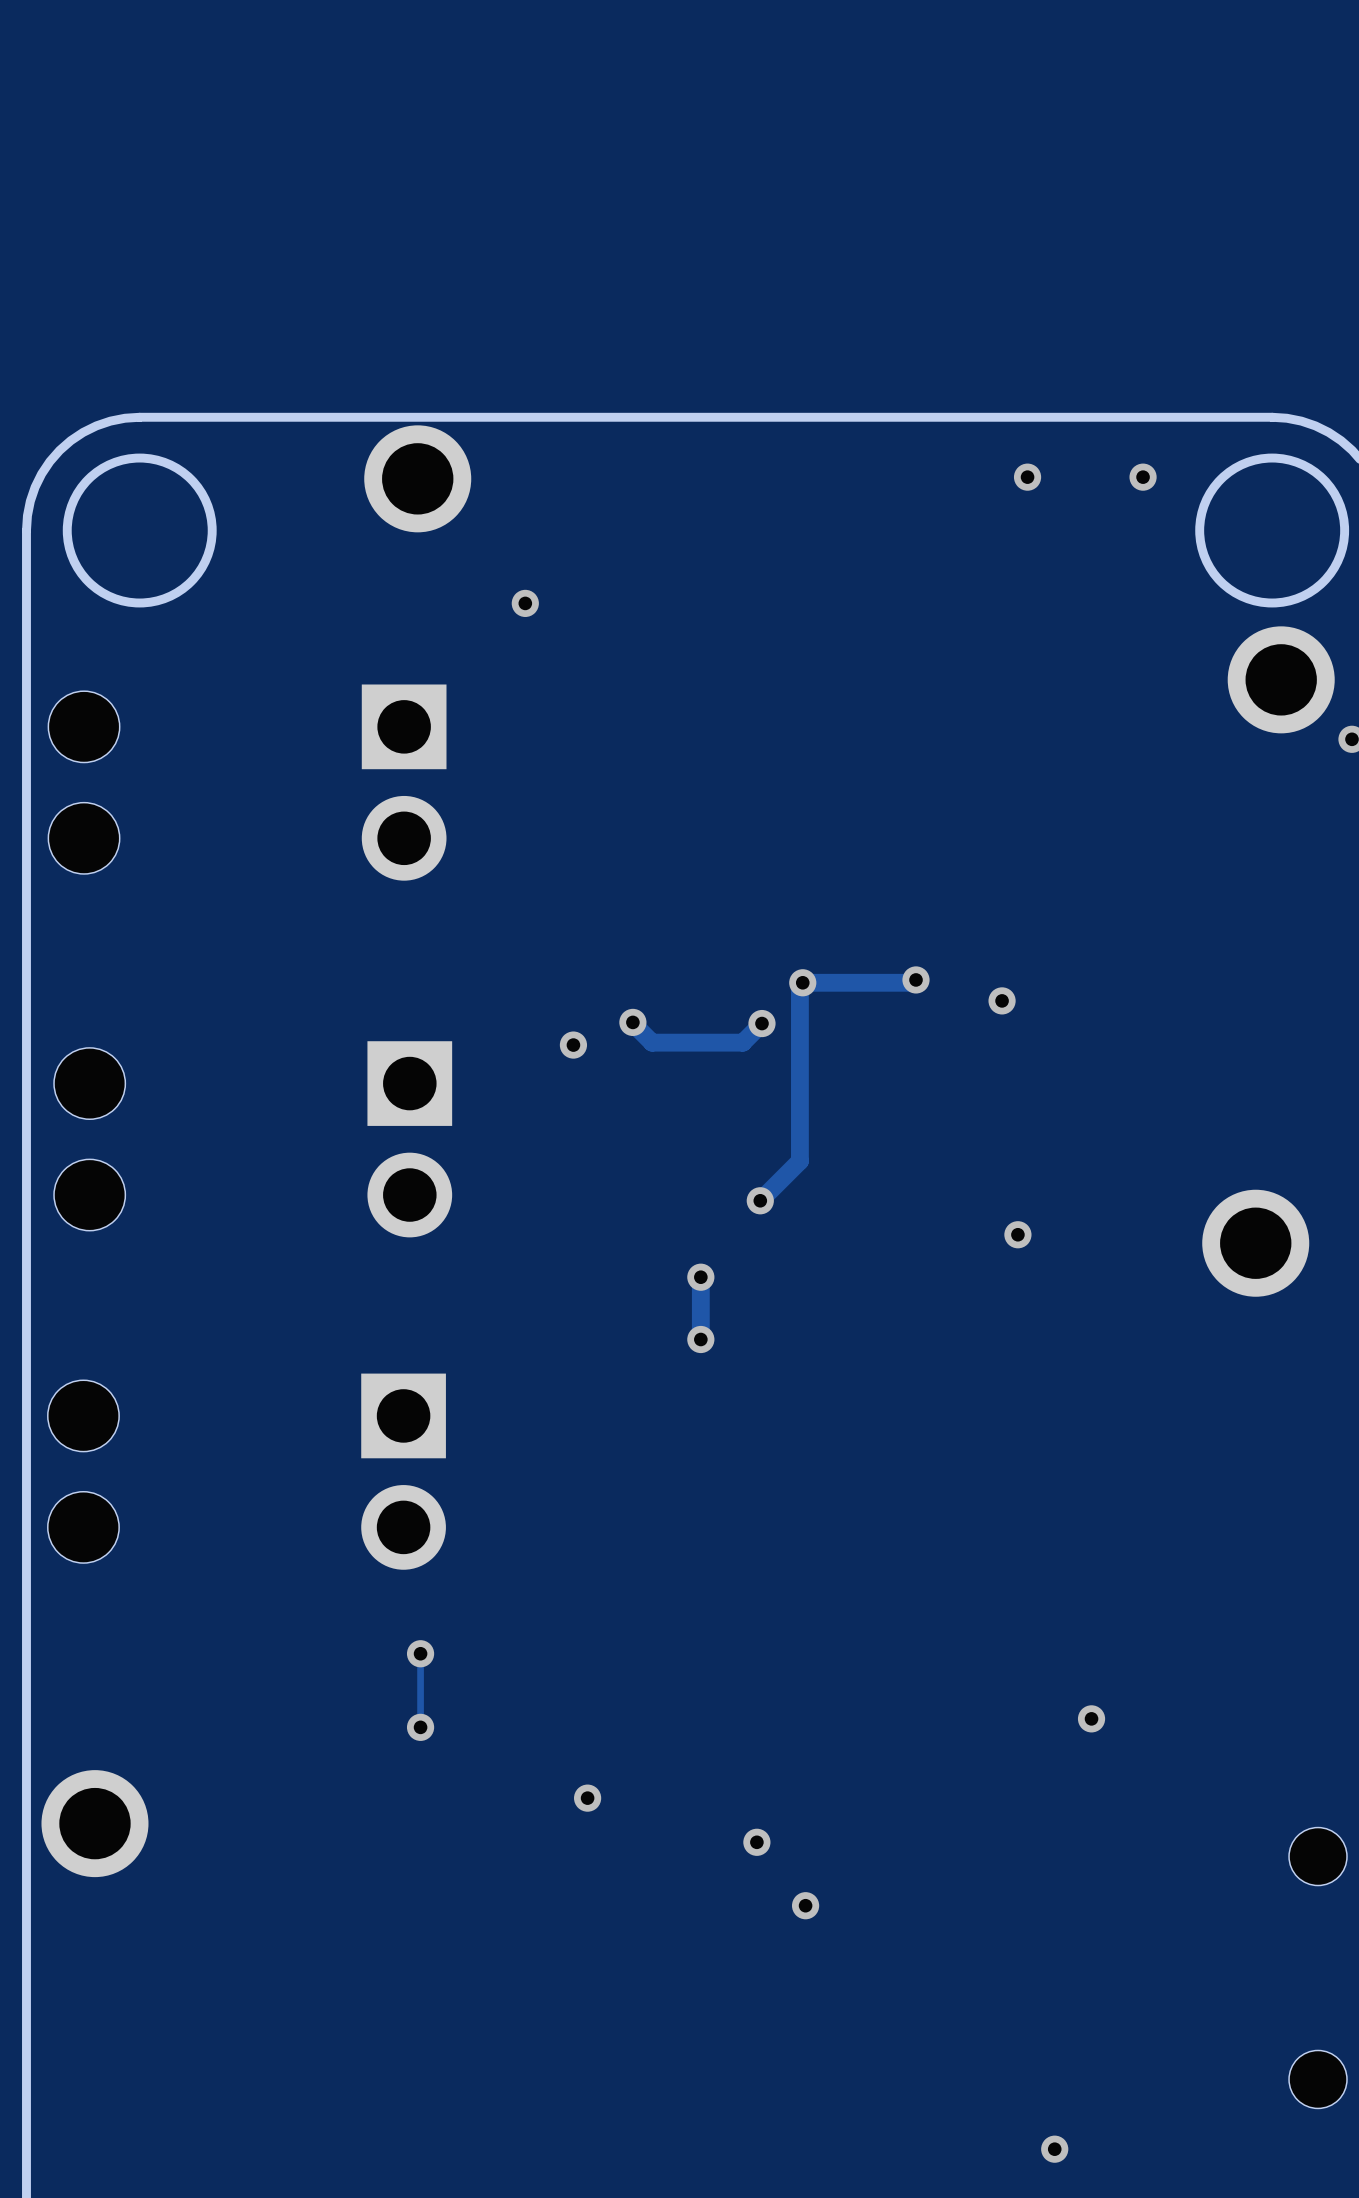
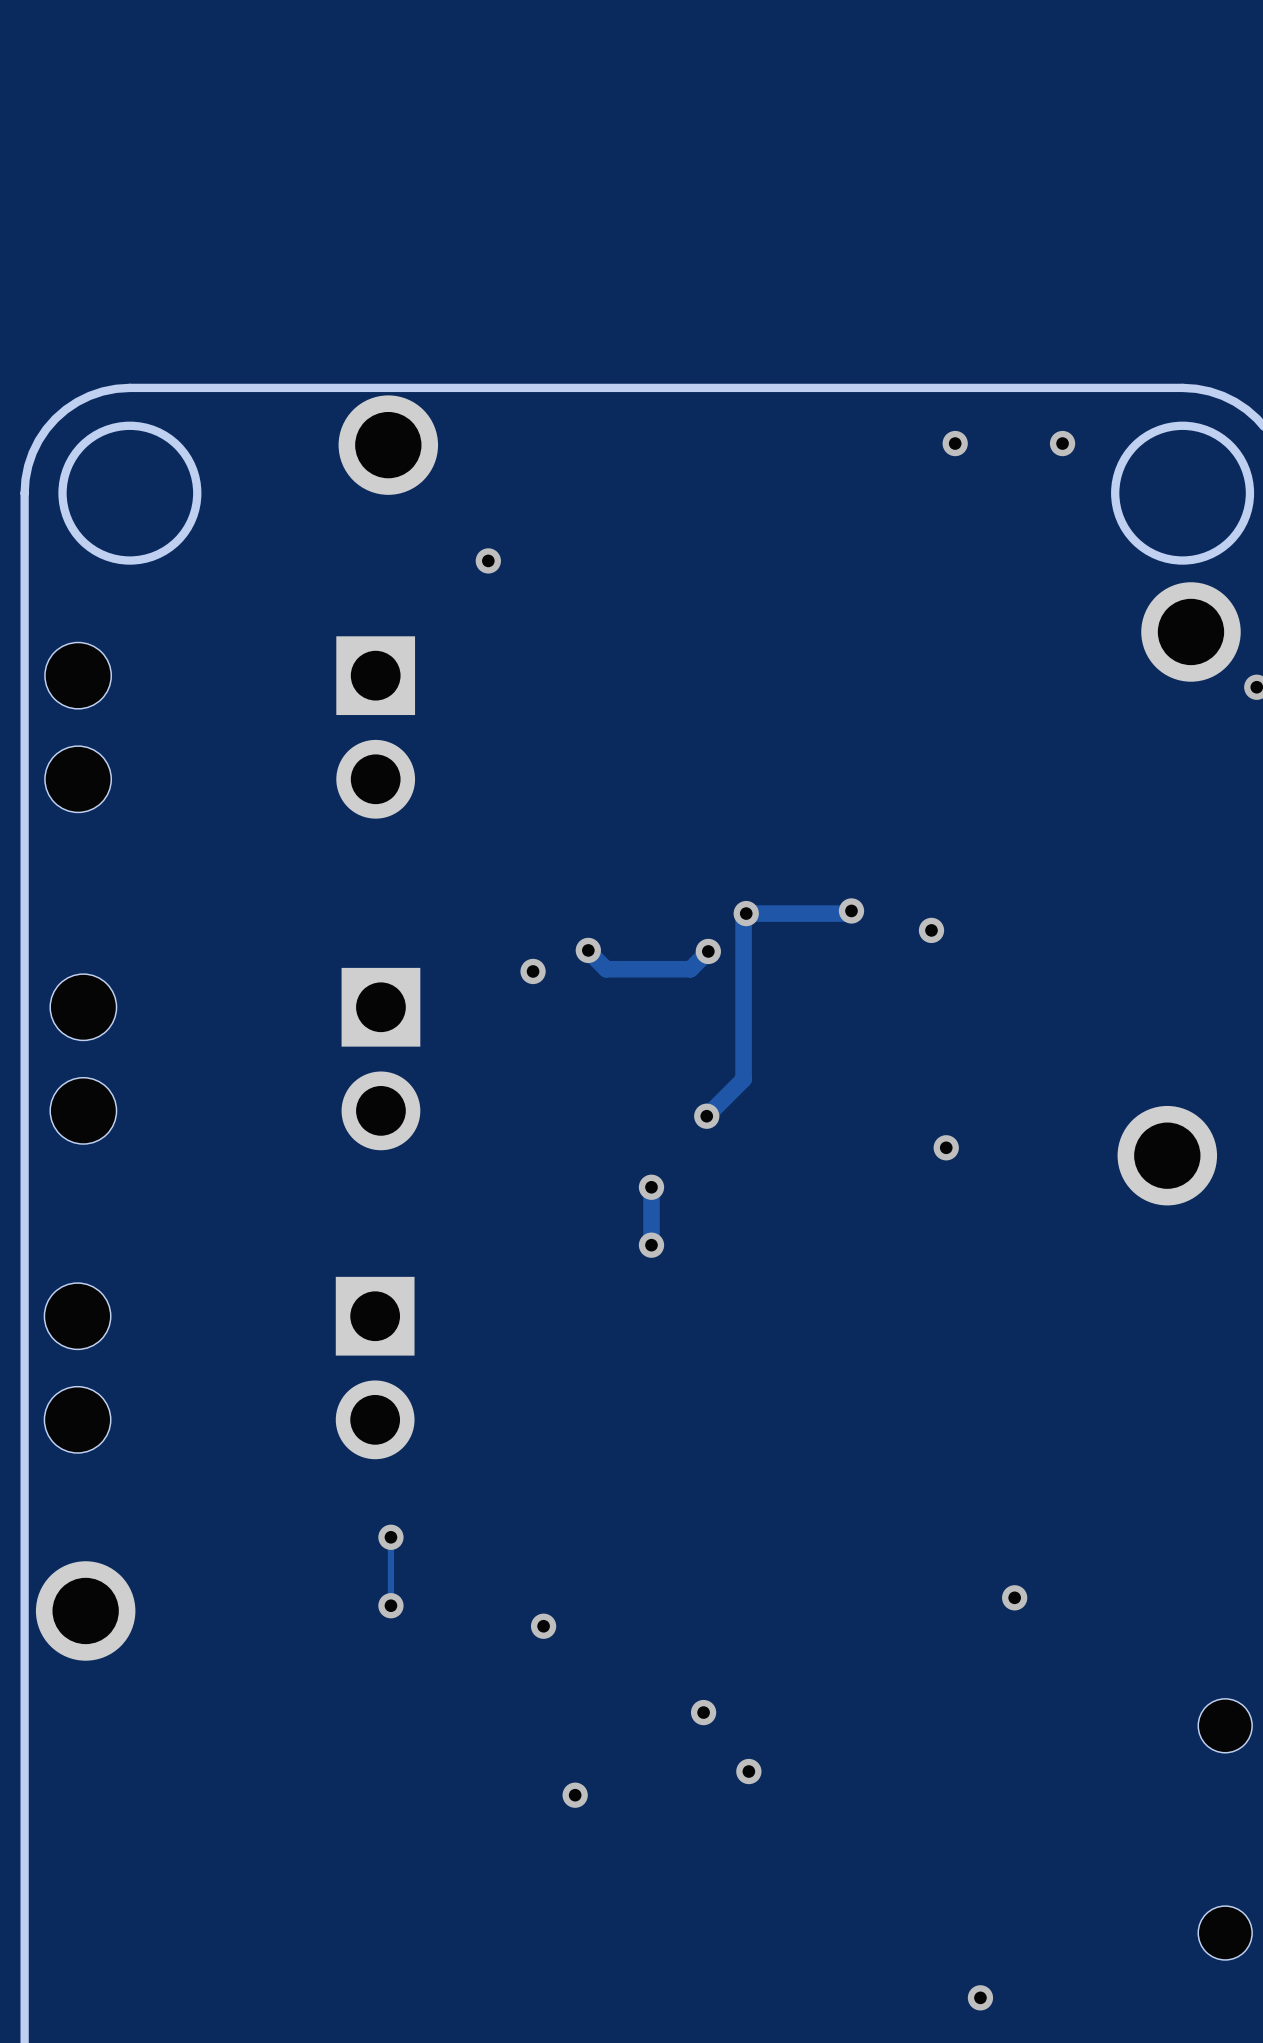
via position: (587, 1798) -> (543, 1626)
part position: (94, 1823) -> (85, 1610)
via: none -> (575, 1795)

